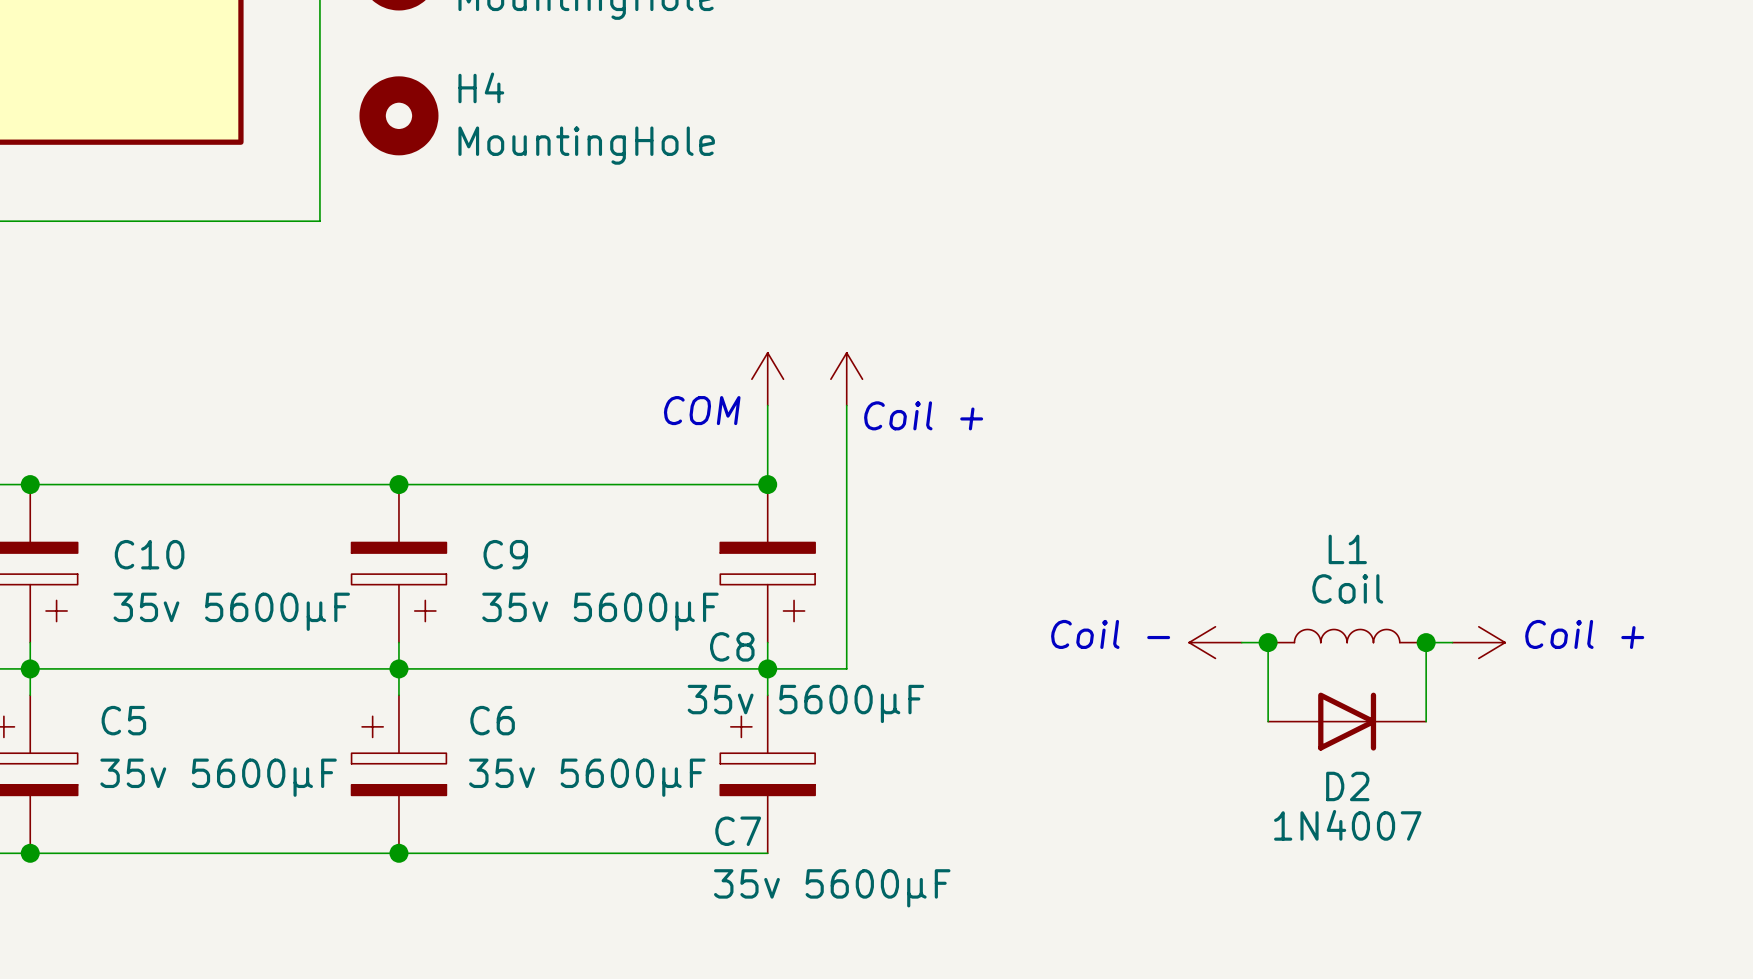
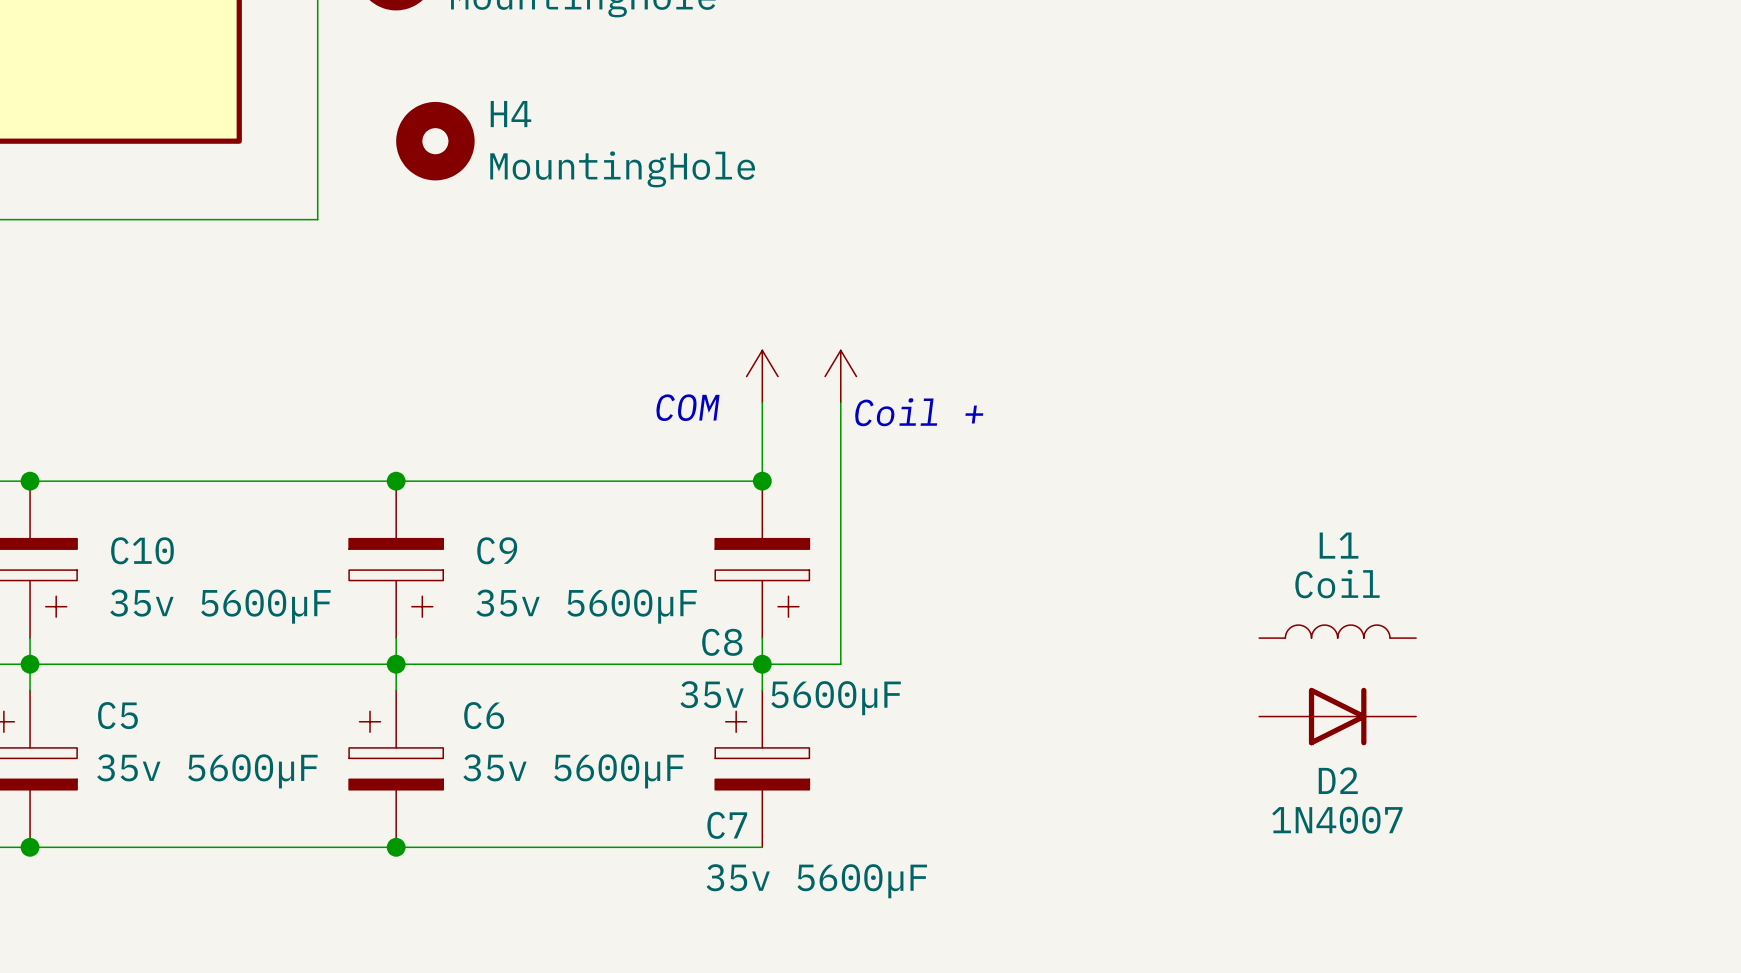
H4 position: (398, 115) -> (435, 141)
text: Coil - (1110, 634) -> none
text: Coil + (1584, 634) -> none
power symbol: (1215, 642) -> none
wire: (1241, 642) (1268, 642) (1268, 721) -> none
junction: (1268, 642) -> none
junction: (1426, 642) -> none
wire: (1452, 642) (1426, 642) (1426, 721) -> none
power symbol: (1478, 642) -> none

